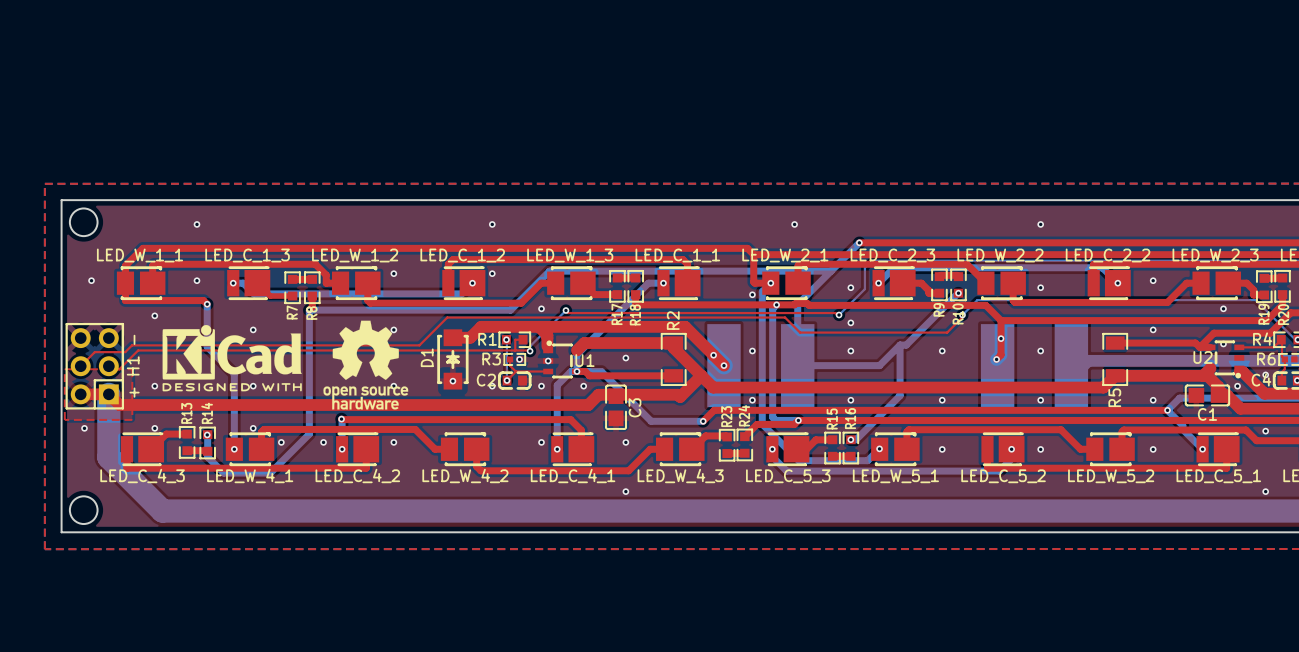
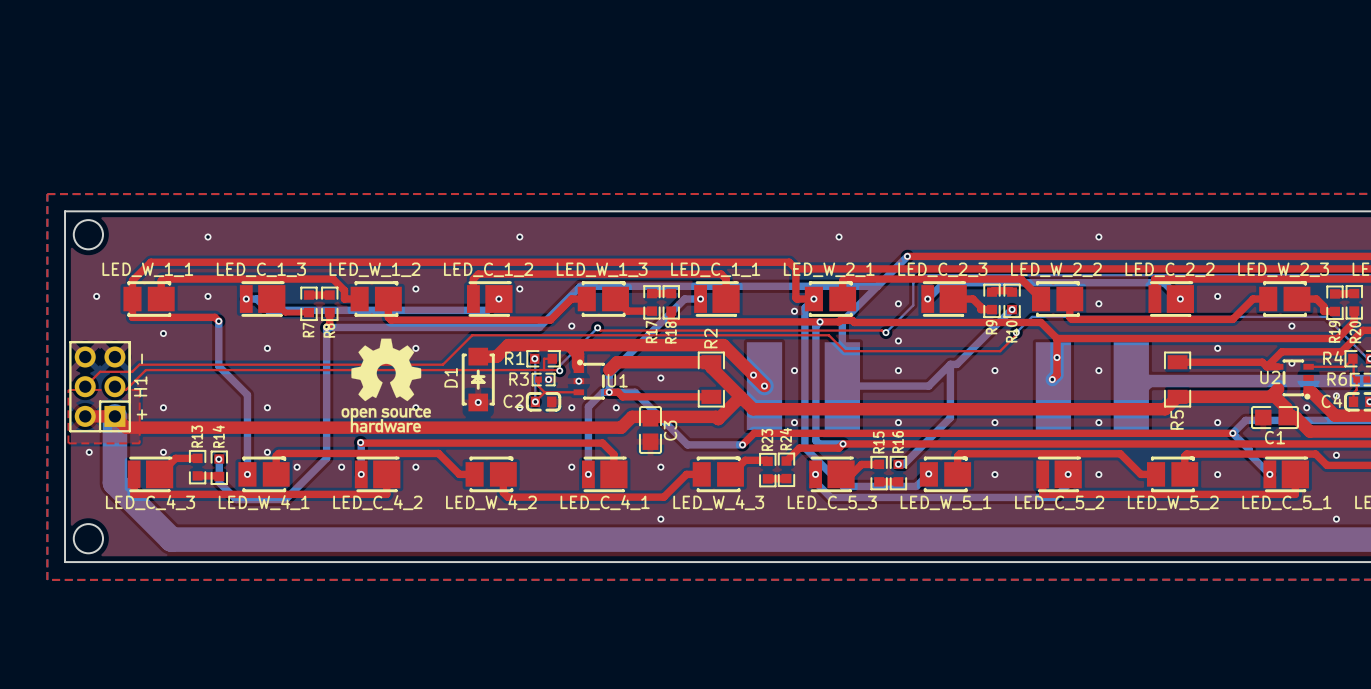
drawing: [162, 325, 302, 392] -> none

